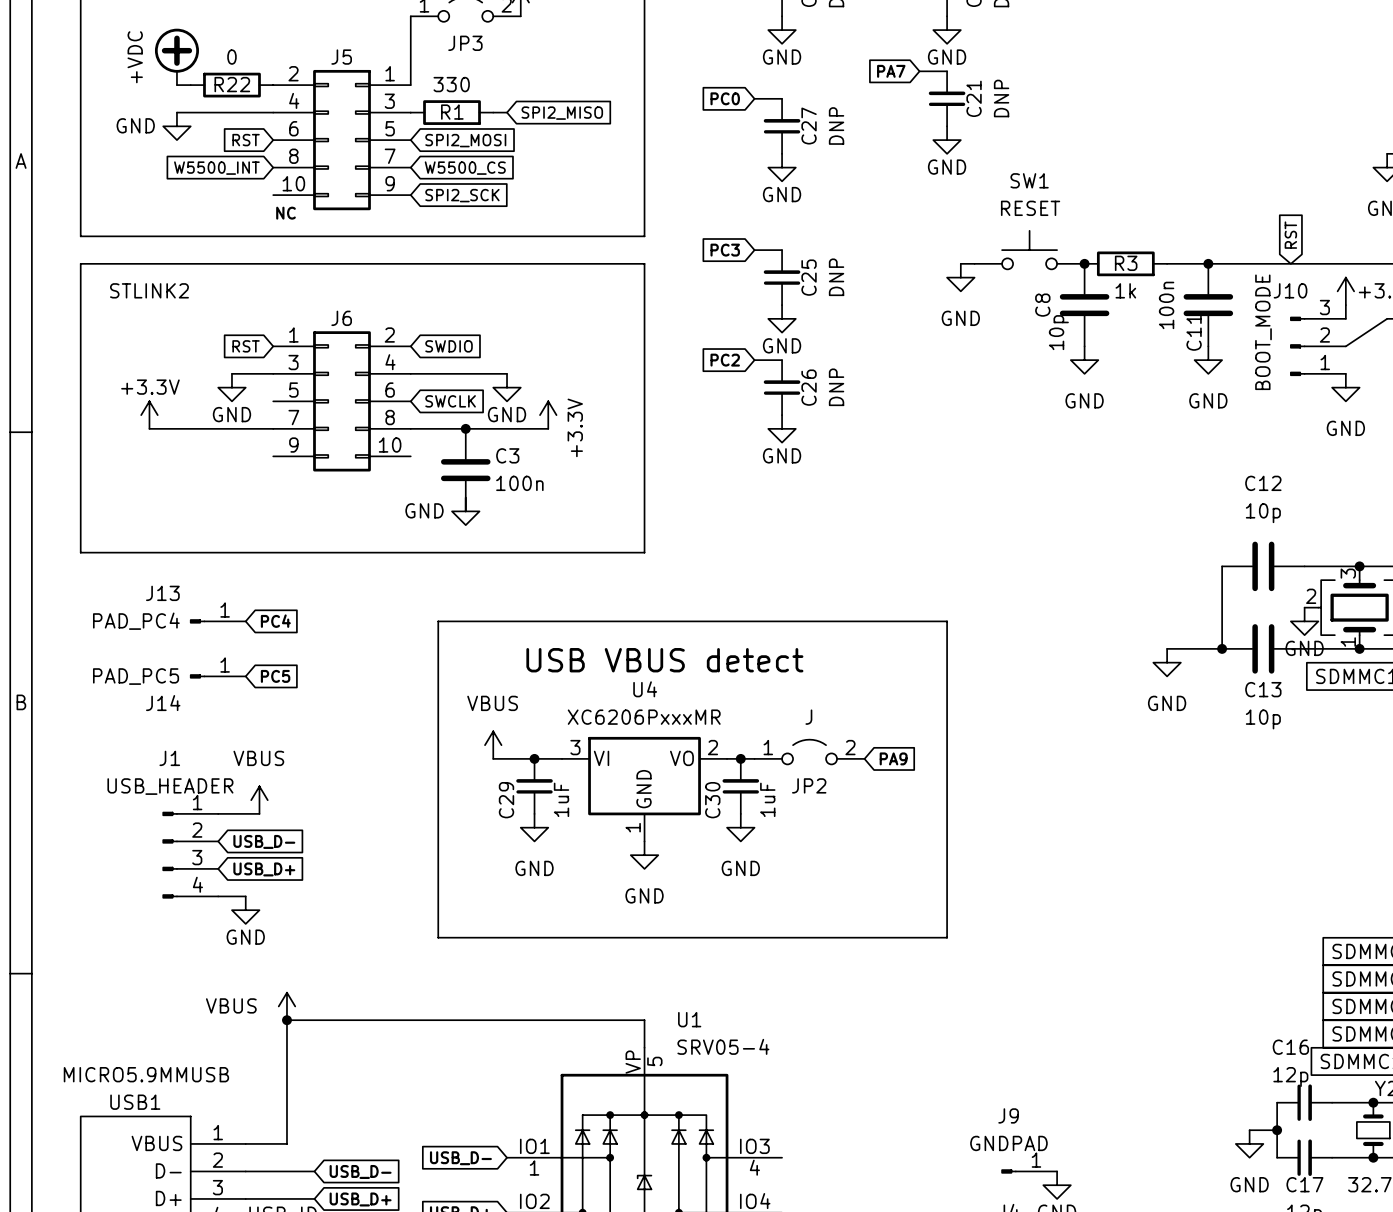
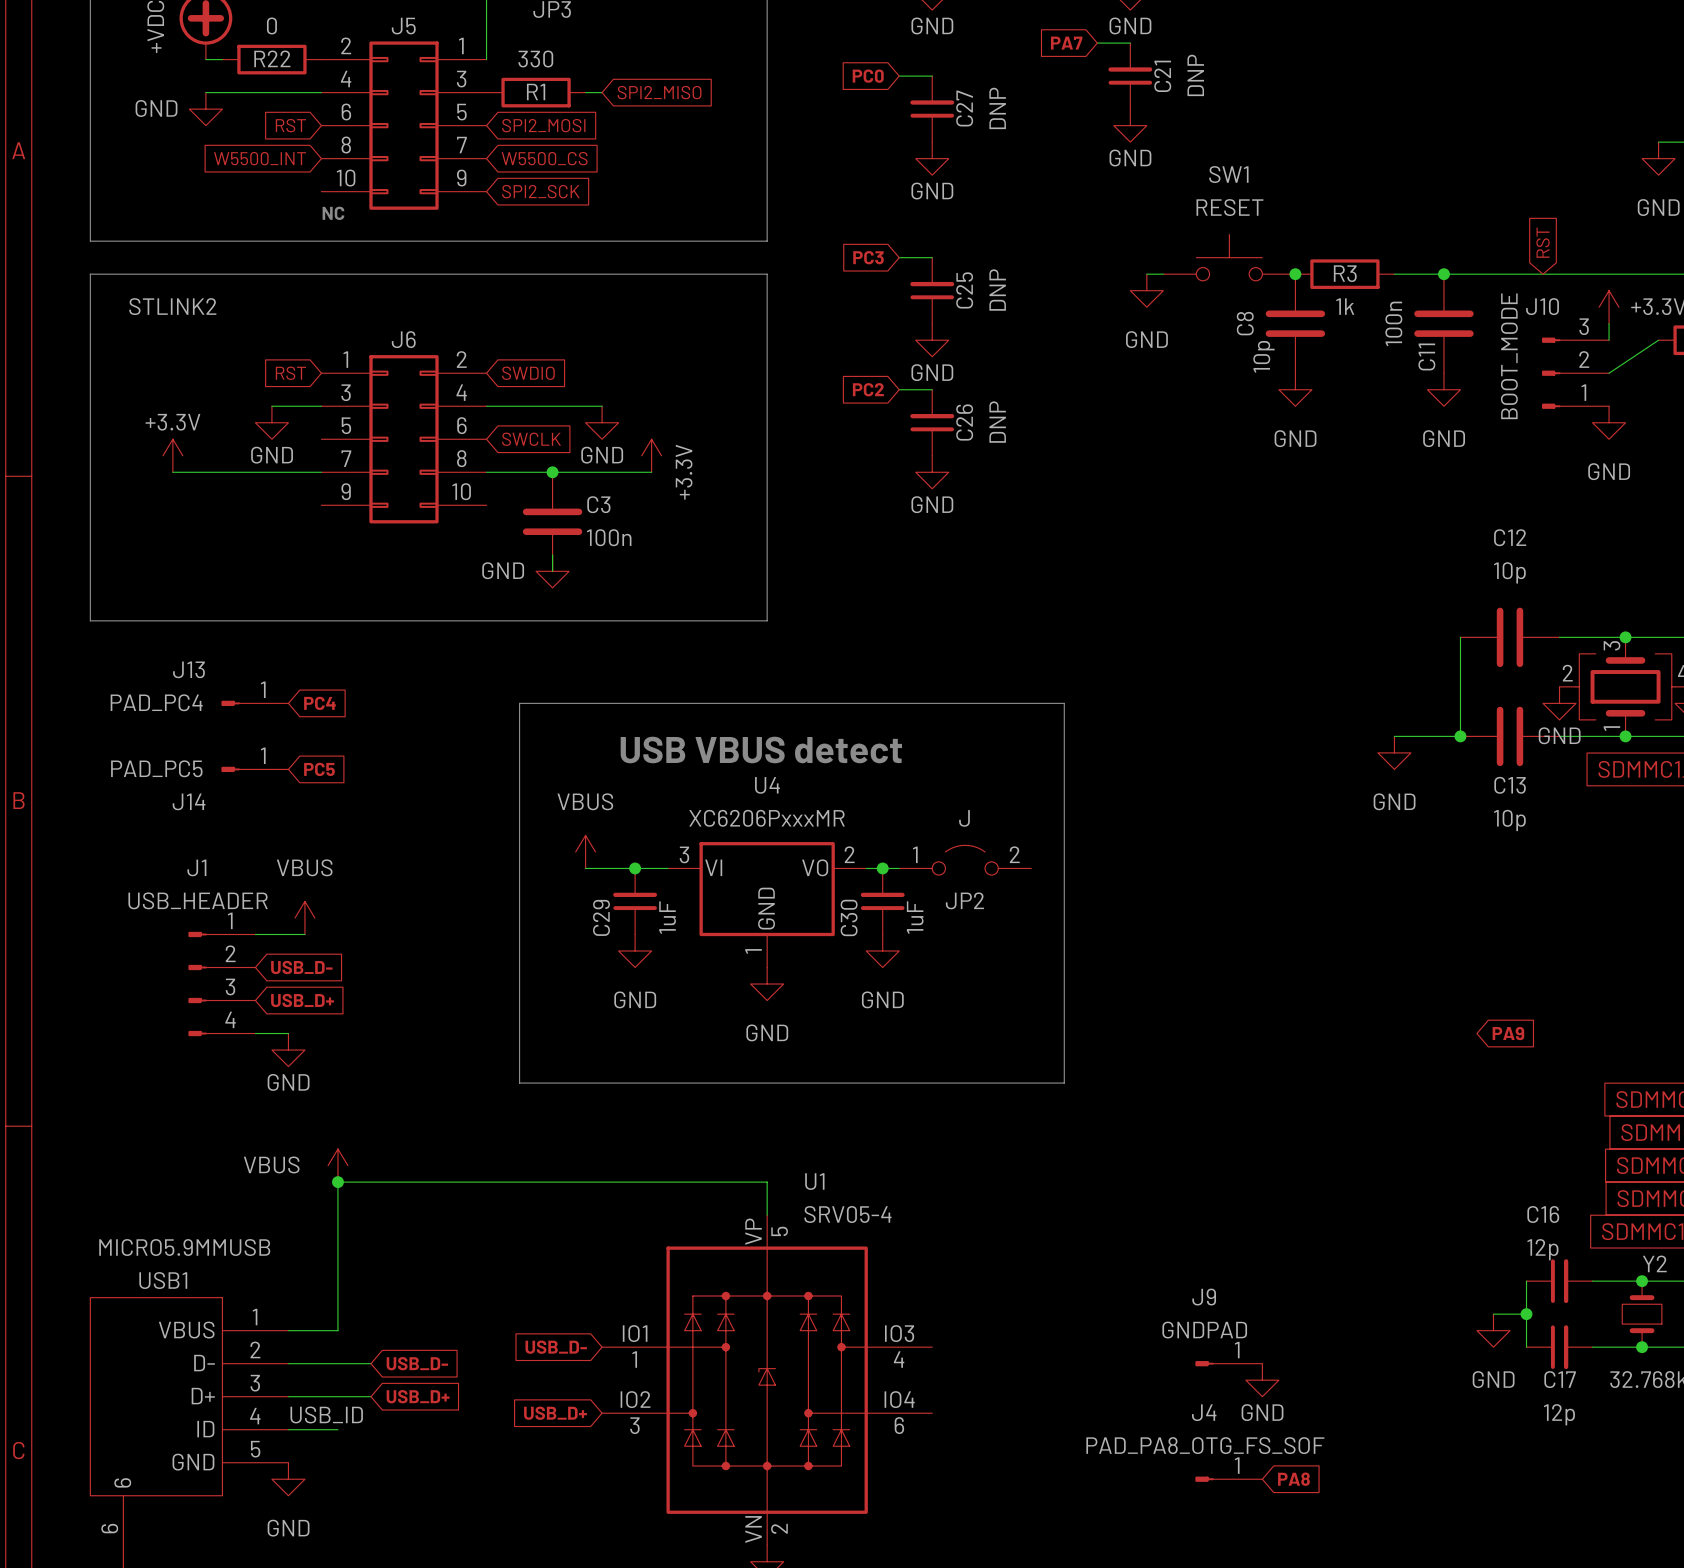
line: (892, 621) (947, 621) (947, 937) (892, 937) -> (1064, 703) (1064, 1083)
global label: PA9 (893, 758) -> none
global label: none -> PA9 (1508, 1033)

